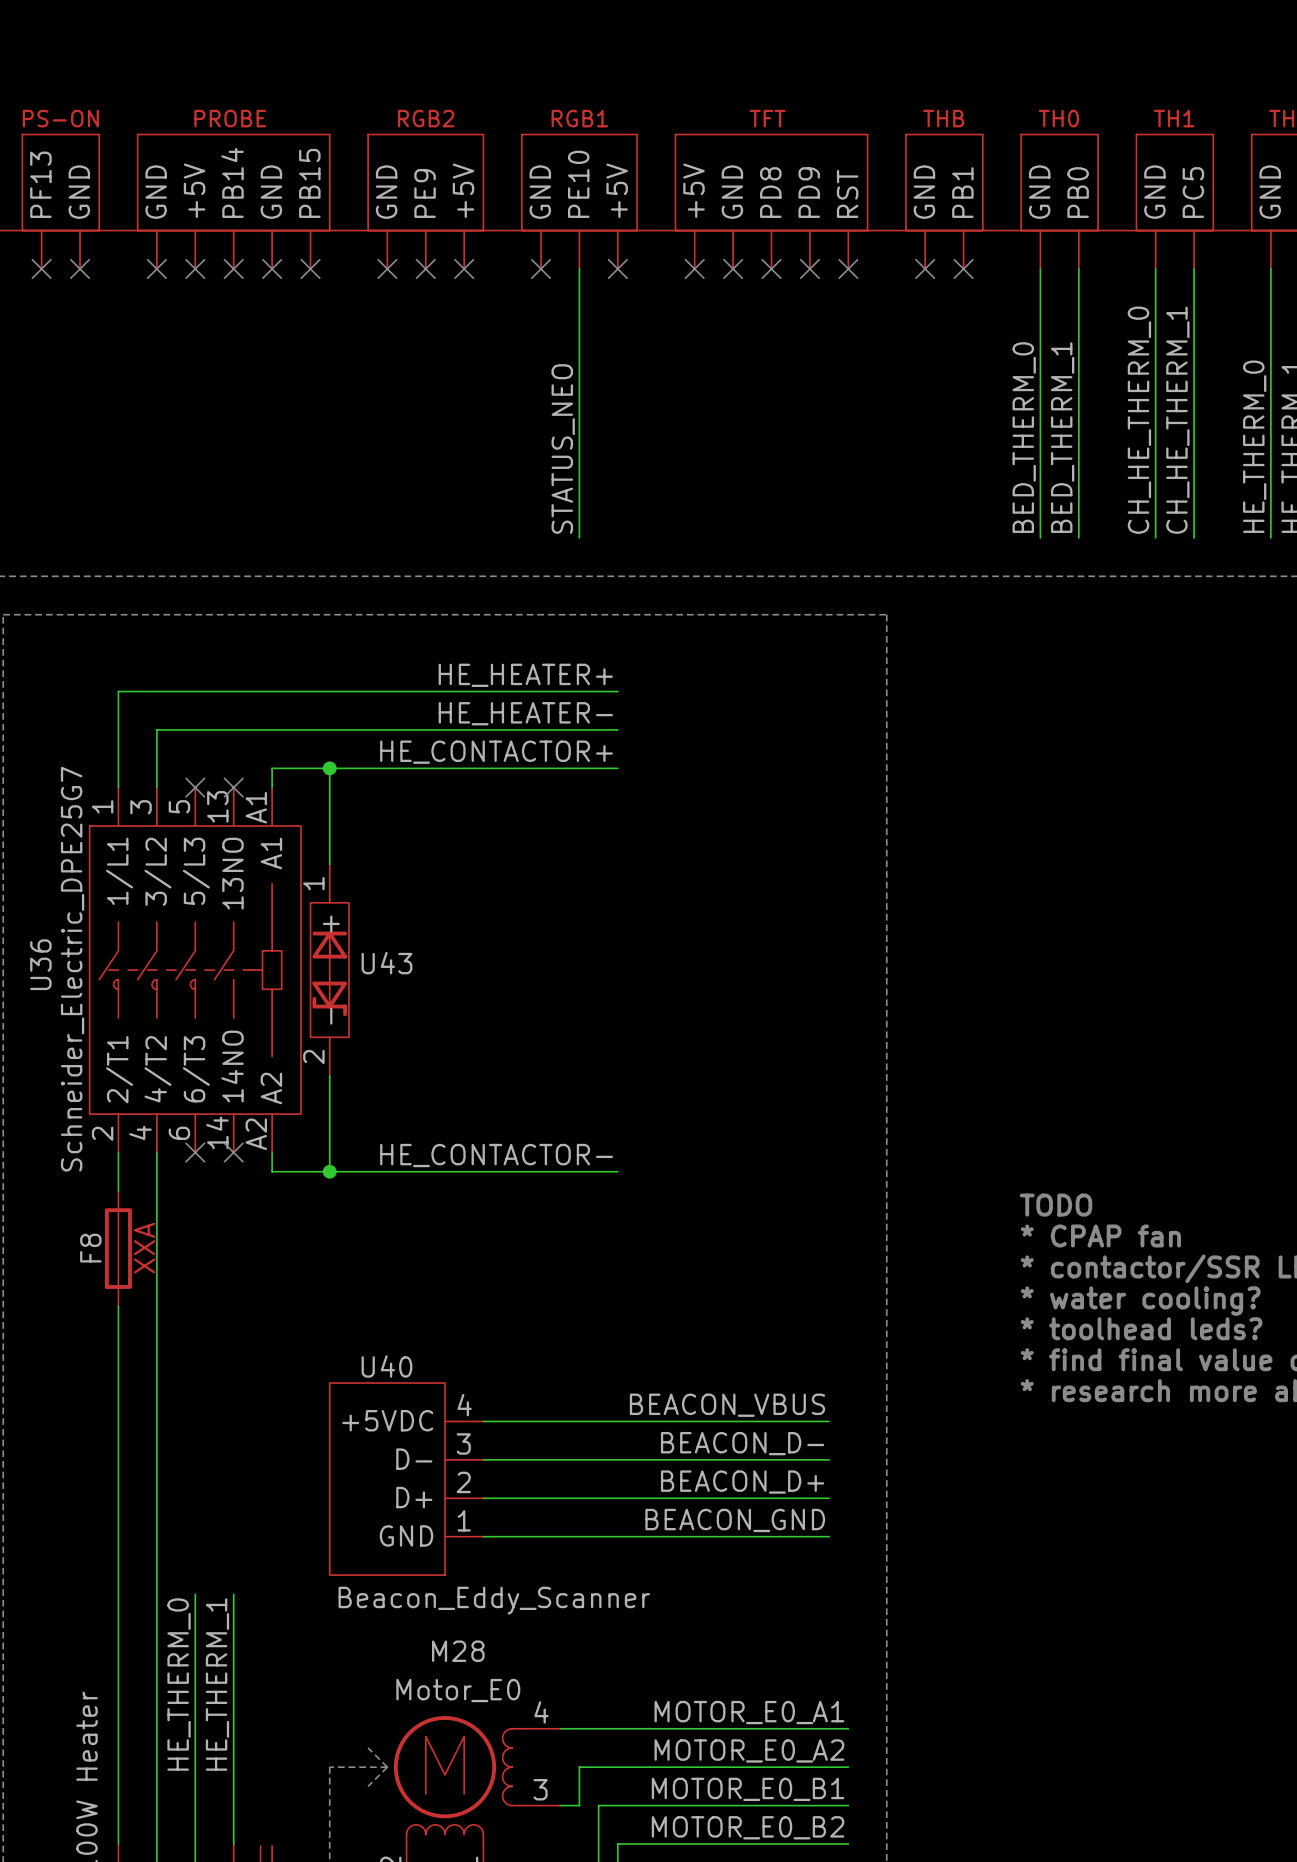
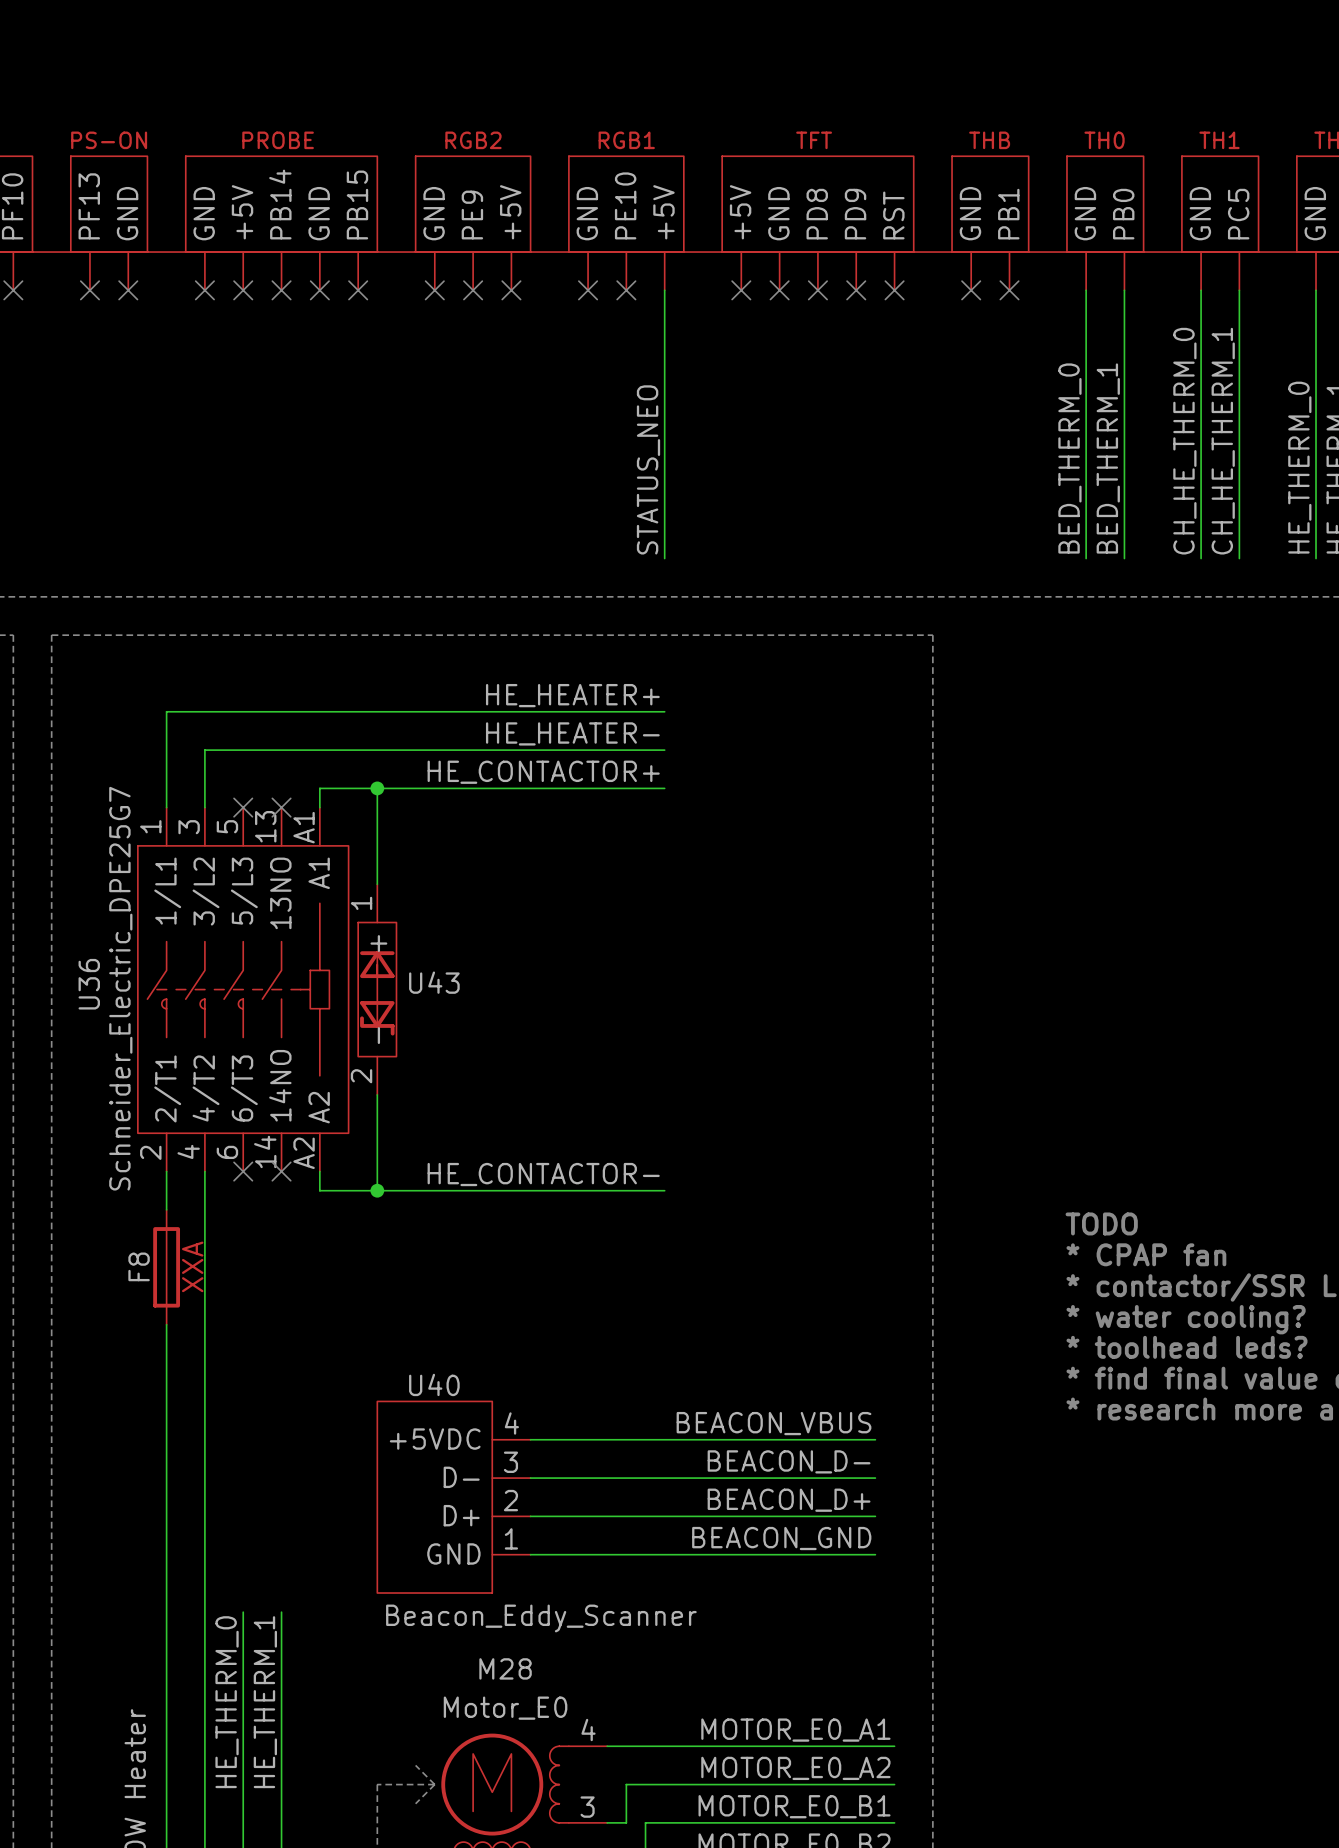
wire: (579, 268) (579, 537) -> (664, 290) (664, 558)
no-connect mark position: (617, 268) -> (626, 290)
label position: STATUS_NEO (563, 449) -> STATUS_NEO (648, 469)

